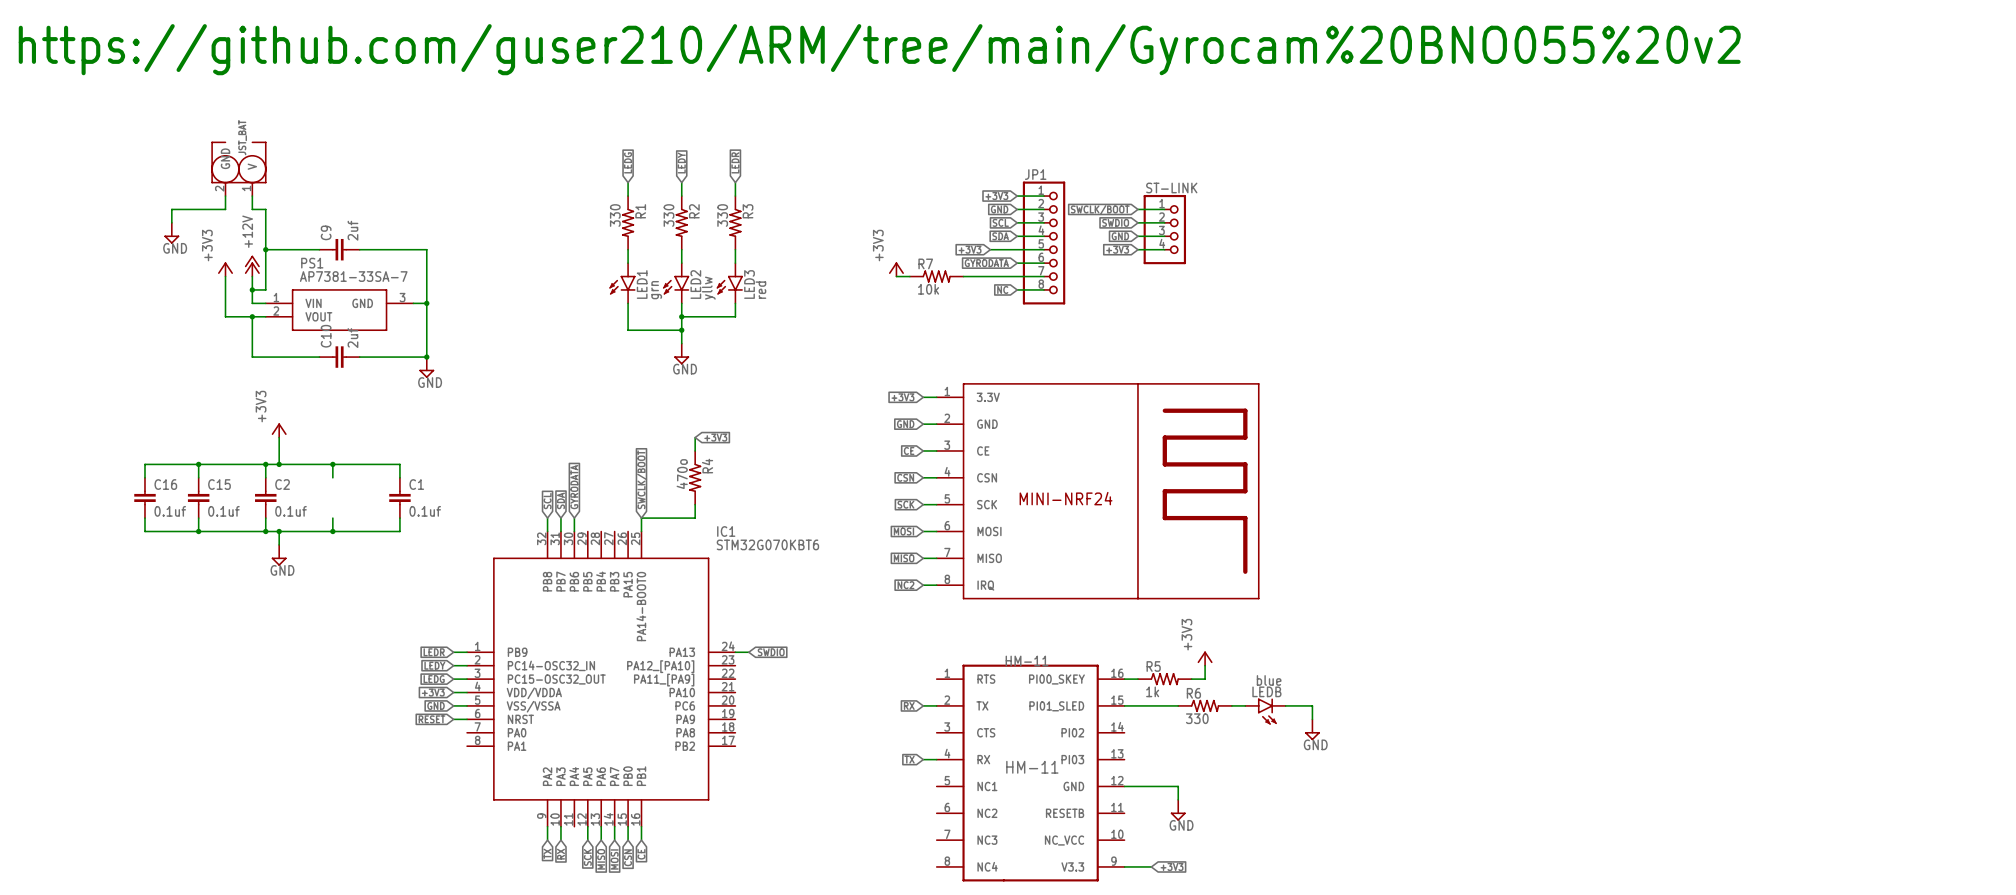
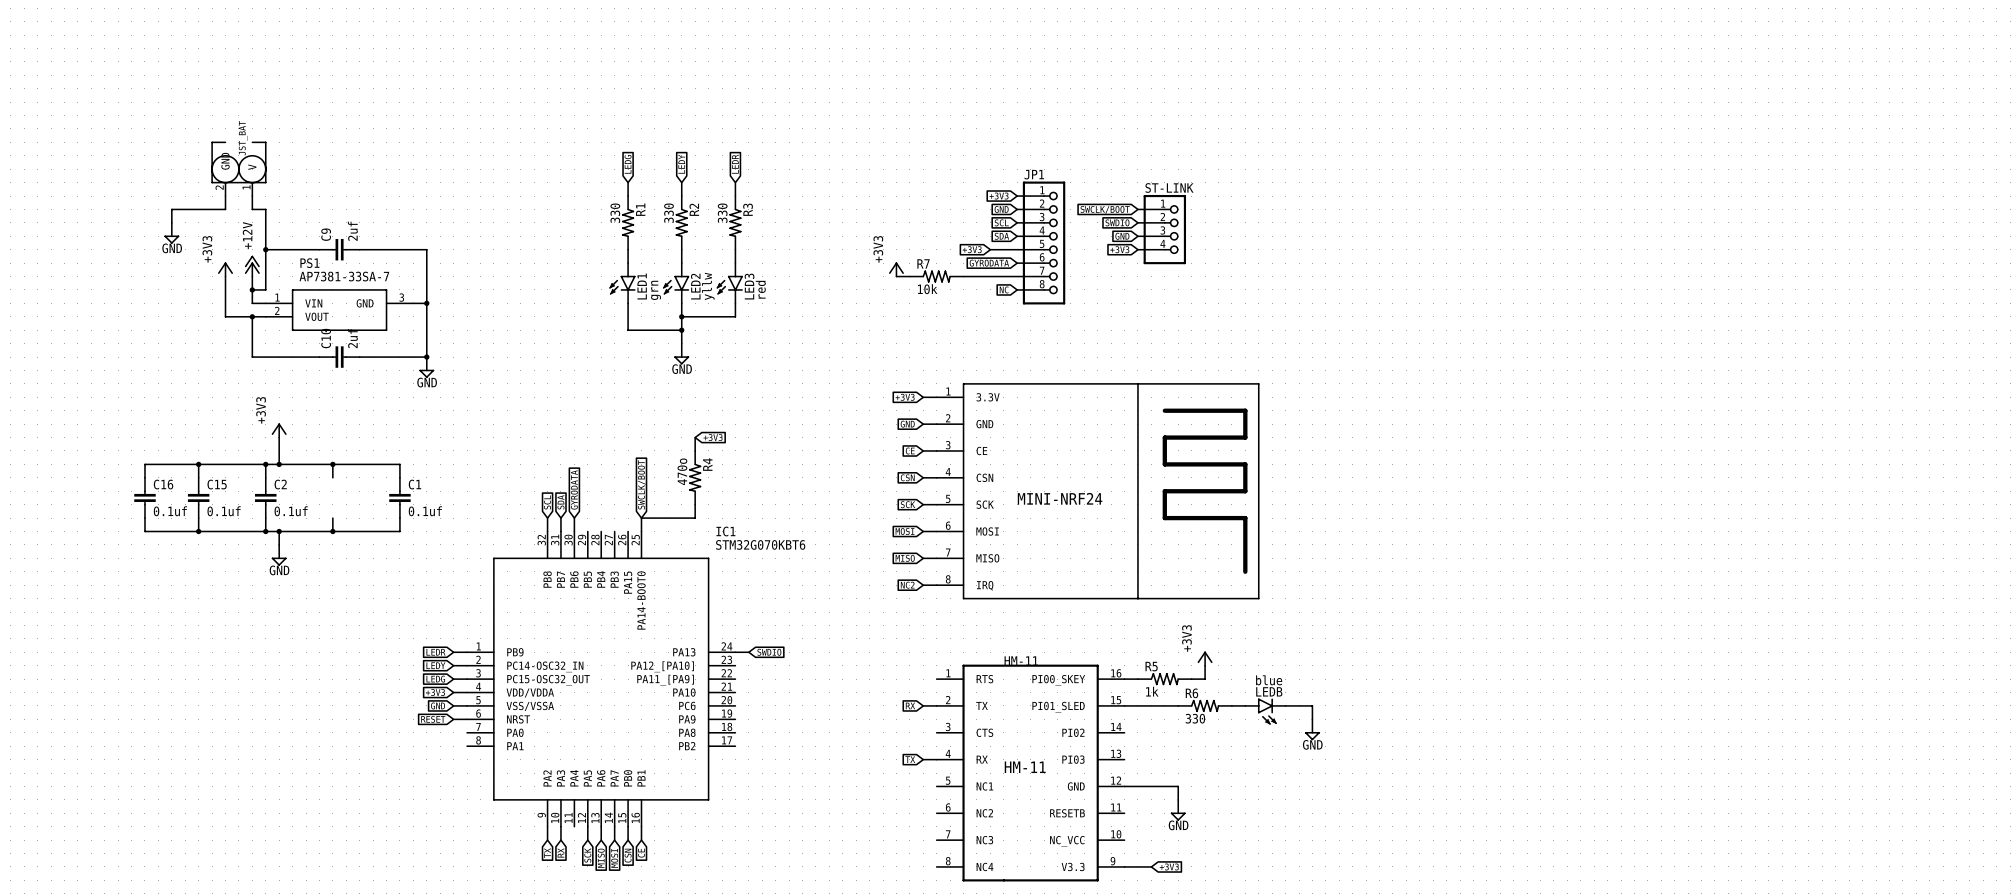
text: https://github.com/guser210/ARM/tree/main/Gyrocam%20BNO055%20v2 (879, 49) -> none

